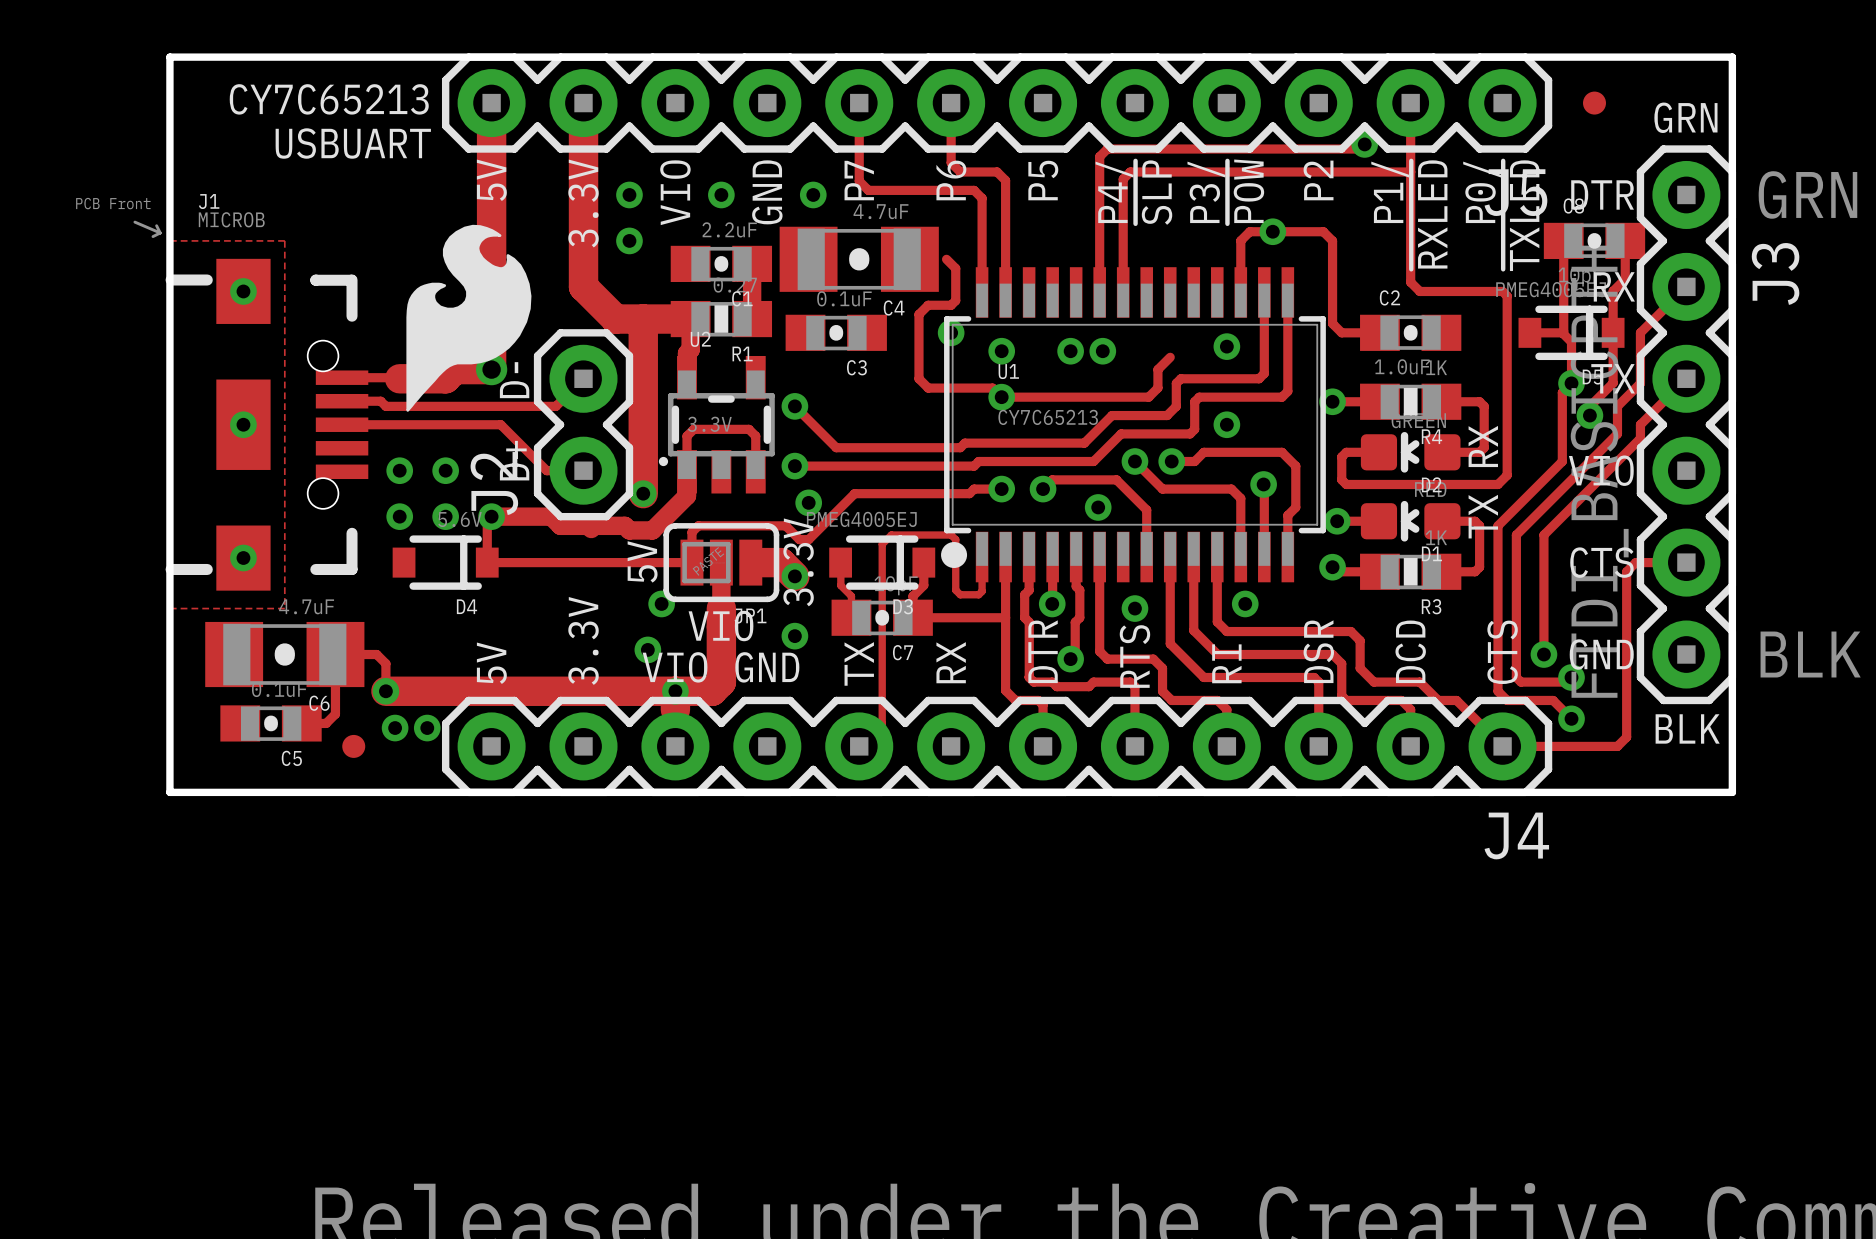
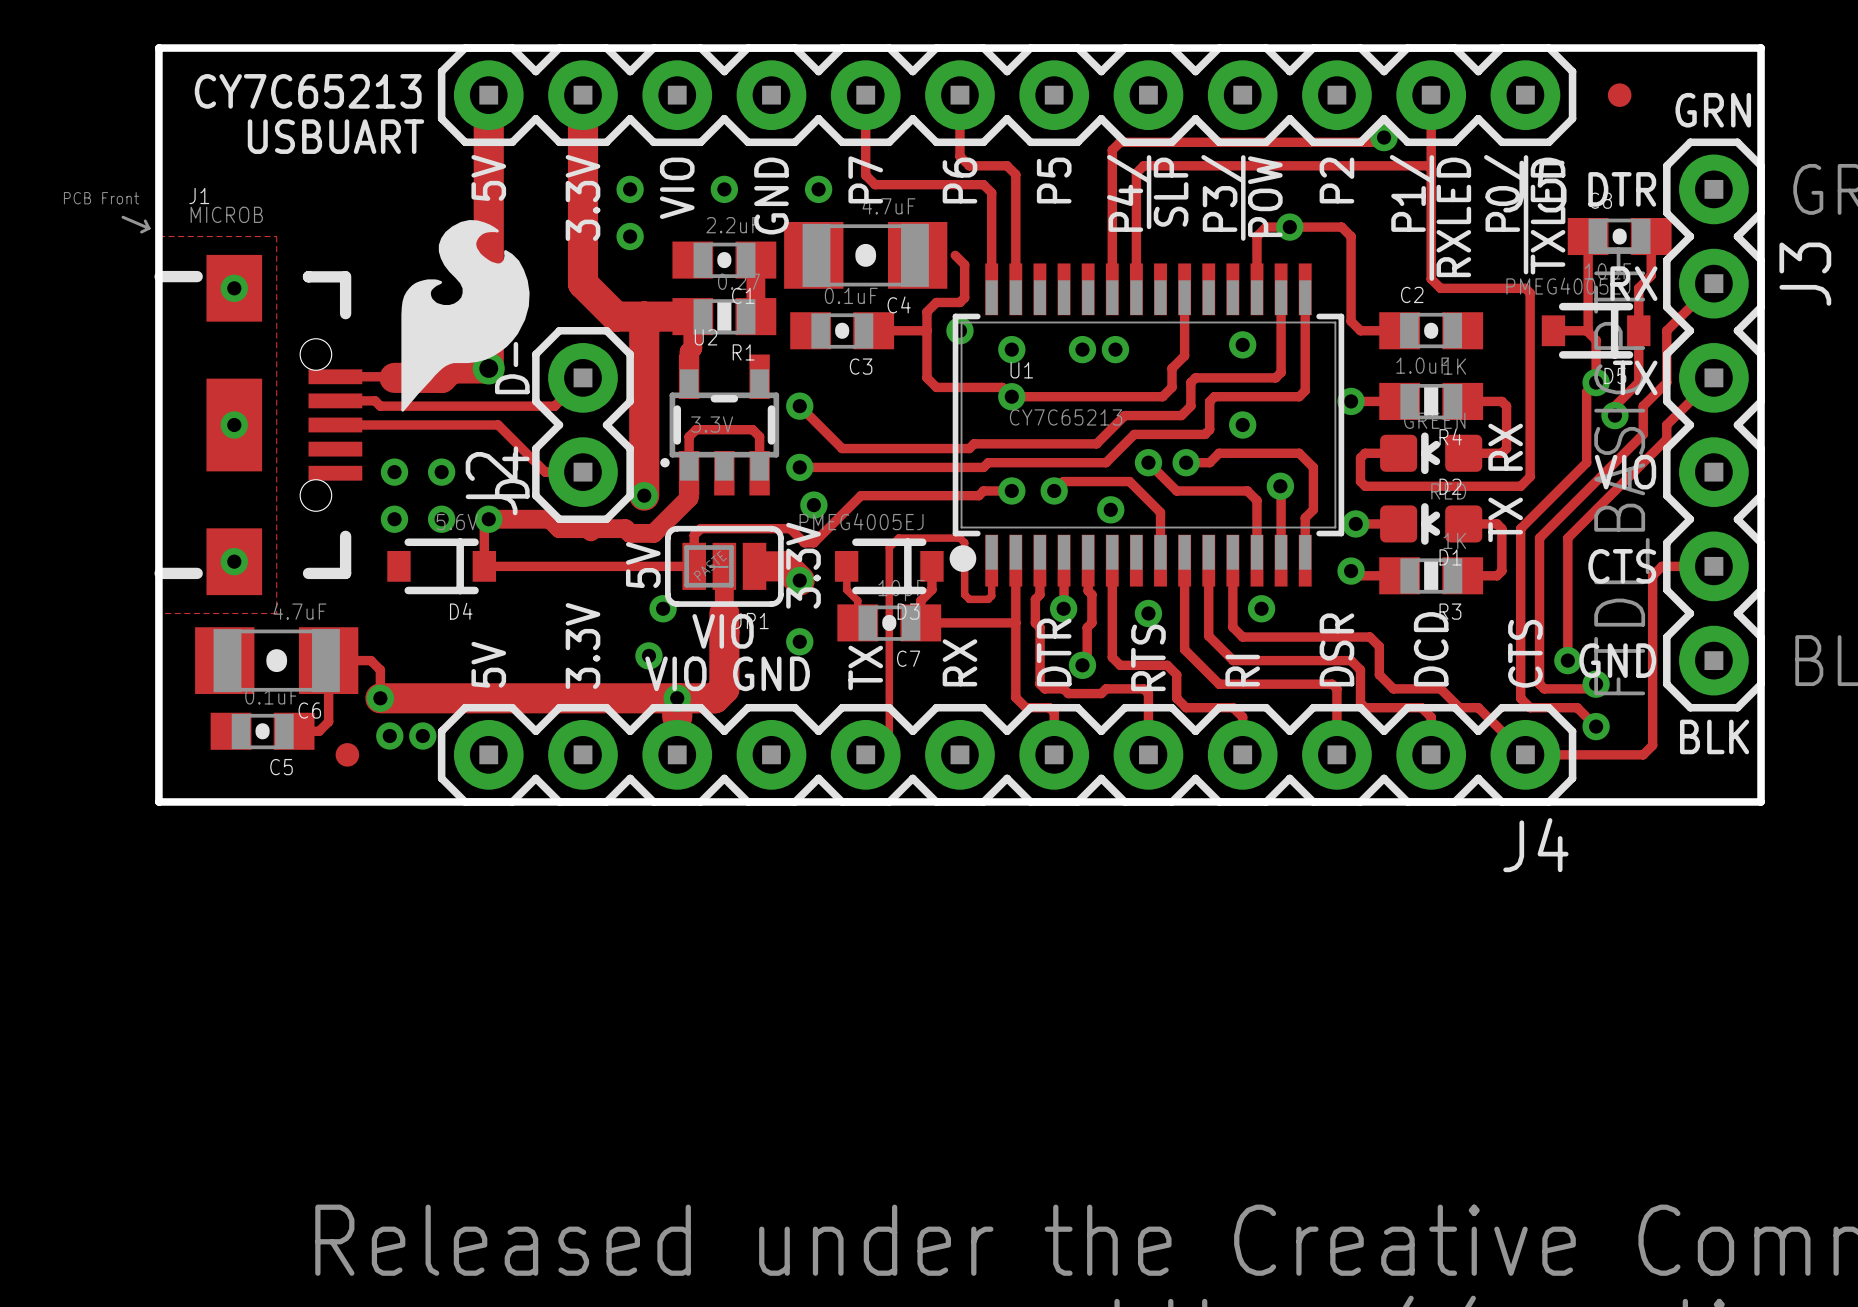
track: none -> (1184, 289) (1184, 355)
track: none -> (873, 330) (926, 330)

